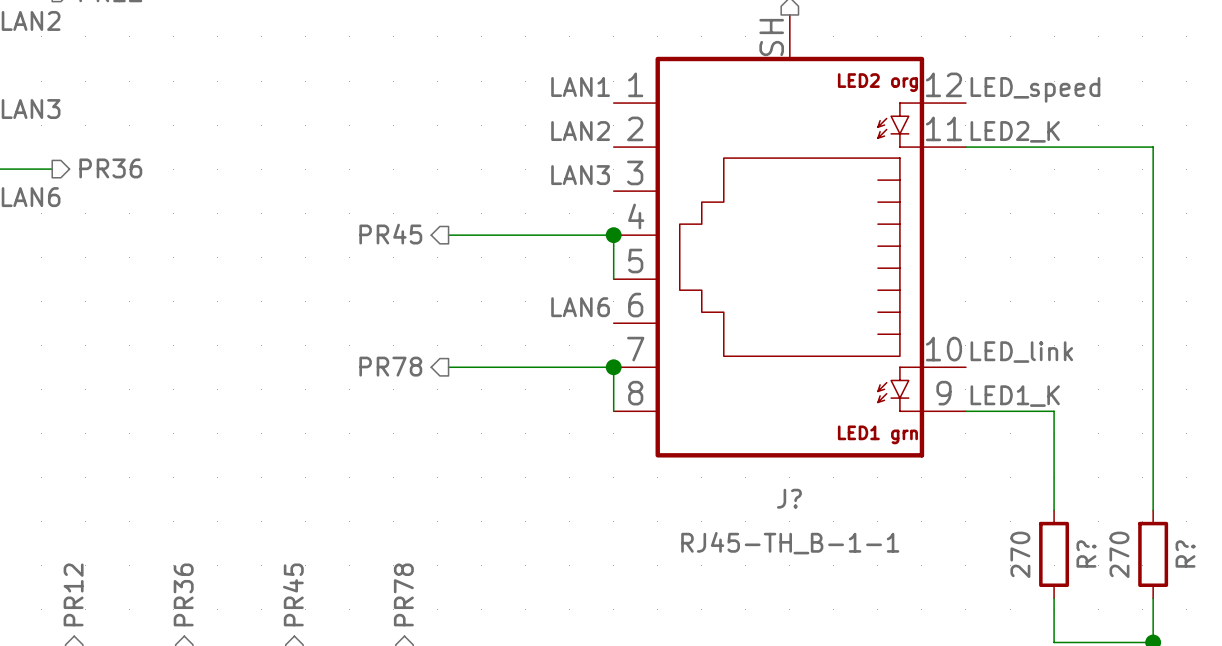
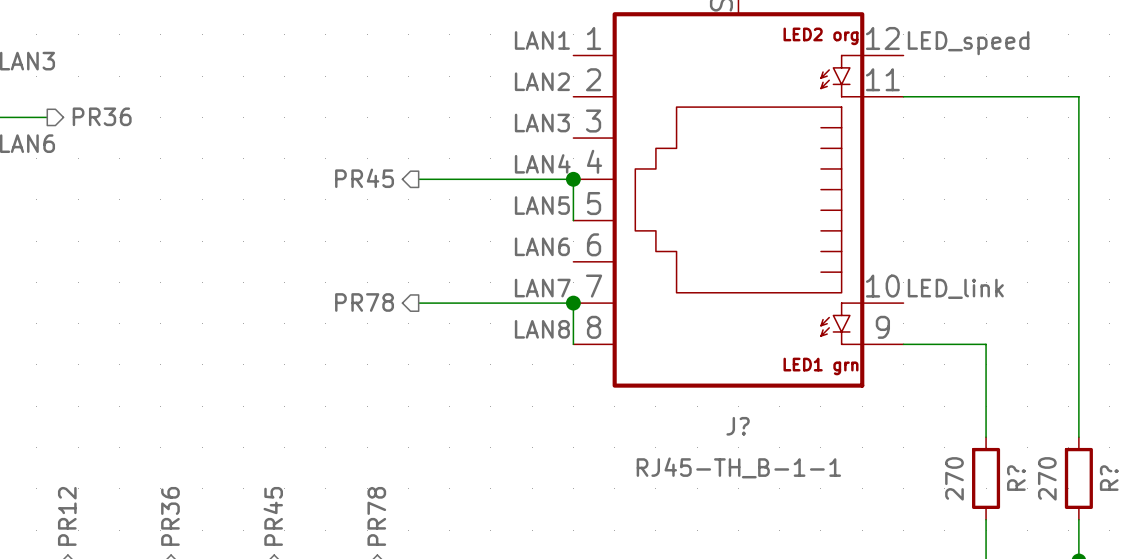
label: LED2_K (1015, 131) -> none
label: none -> LAN4 (542, 163)
label: none -> LAN5 (542, 205)
label: none -> LAN7 (542, 288)
label: none -> LAN8 (542, 329)
label: LED1_K (1015, 396) -> none

